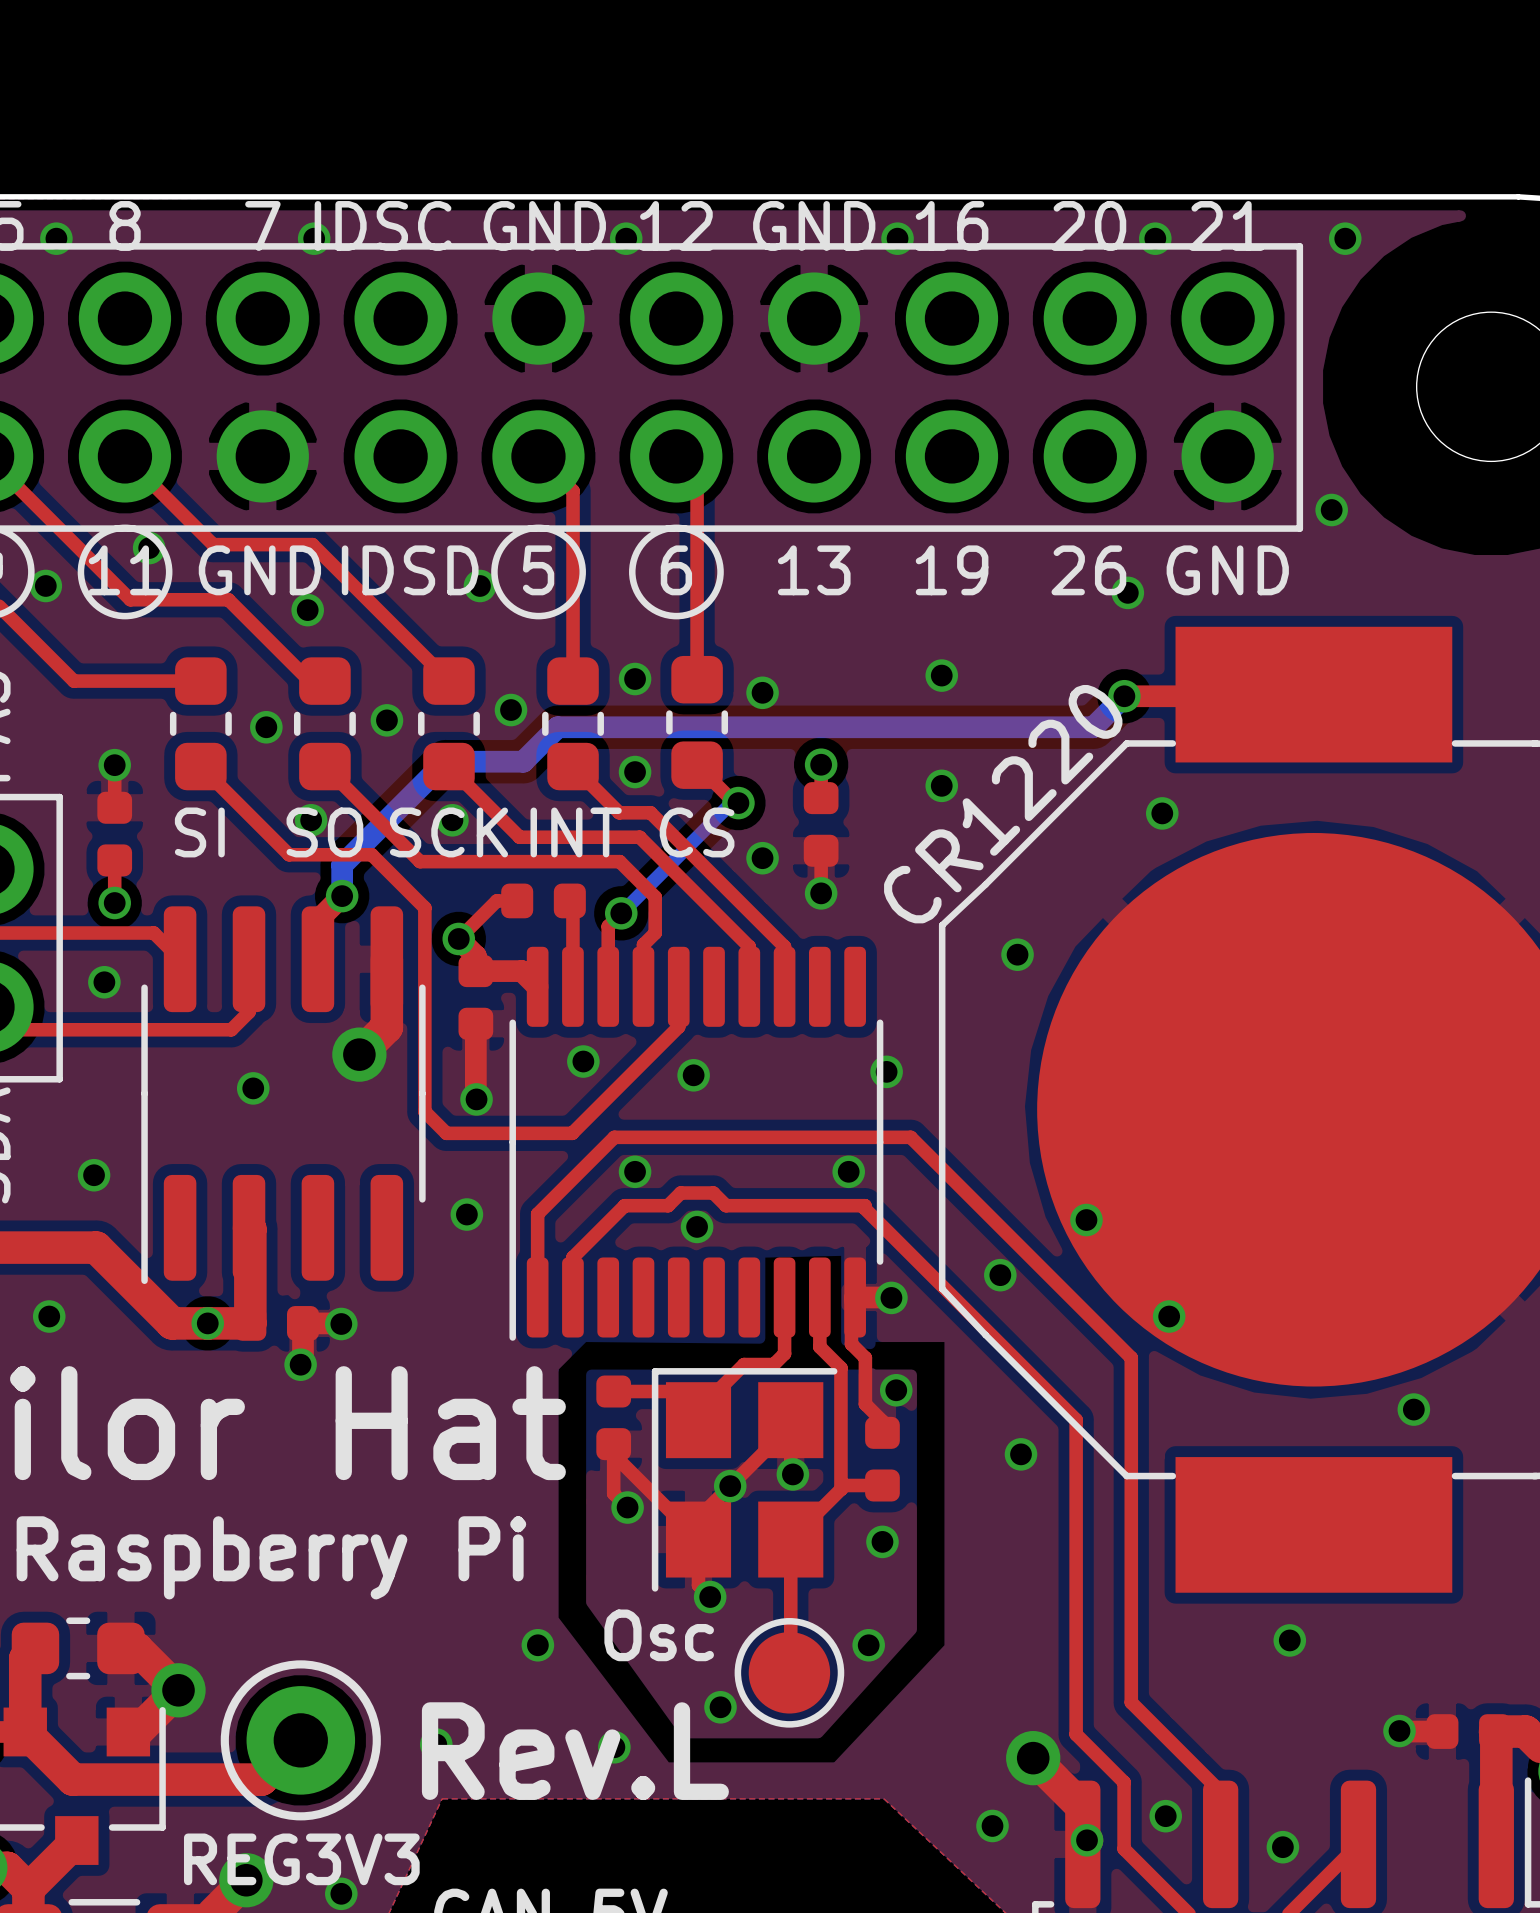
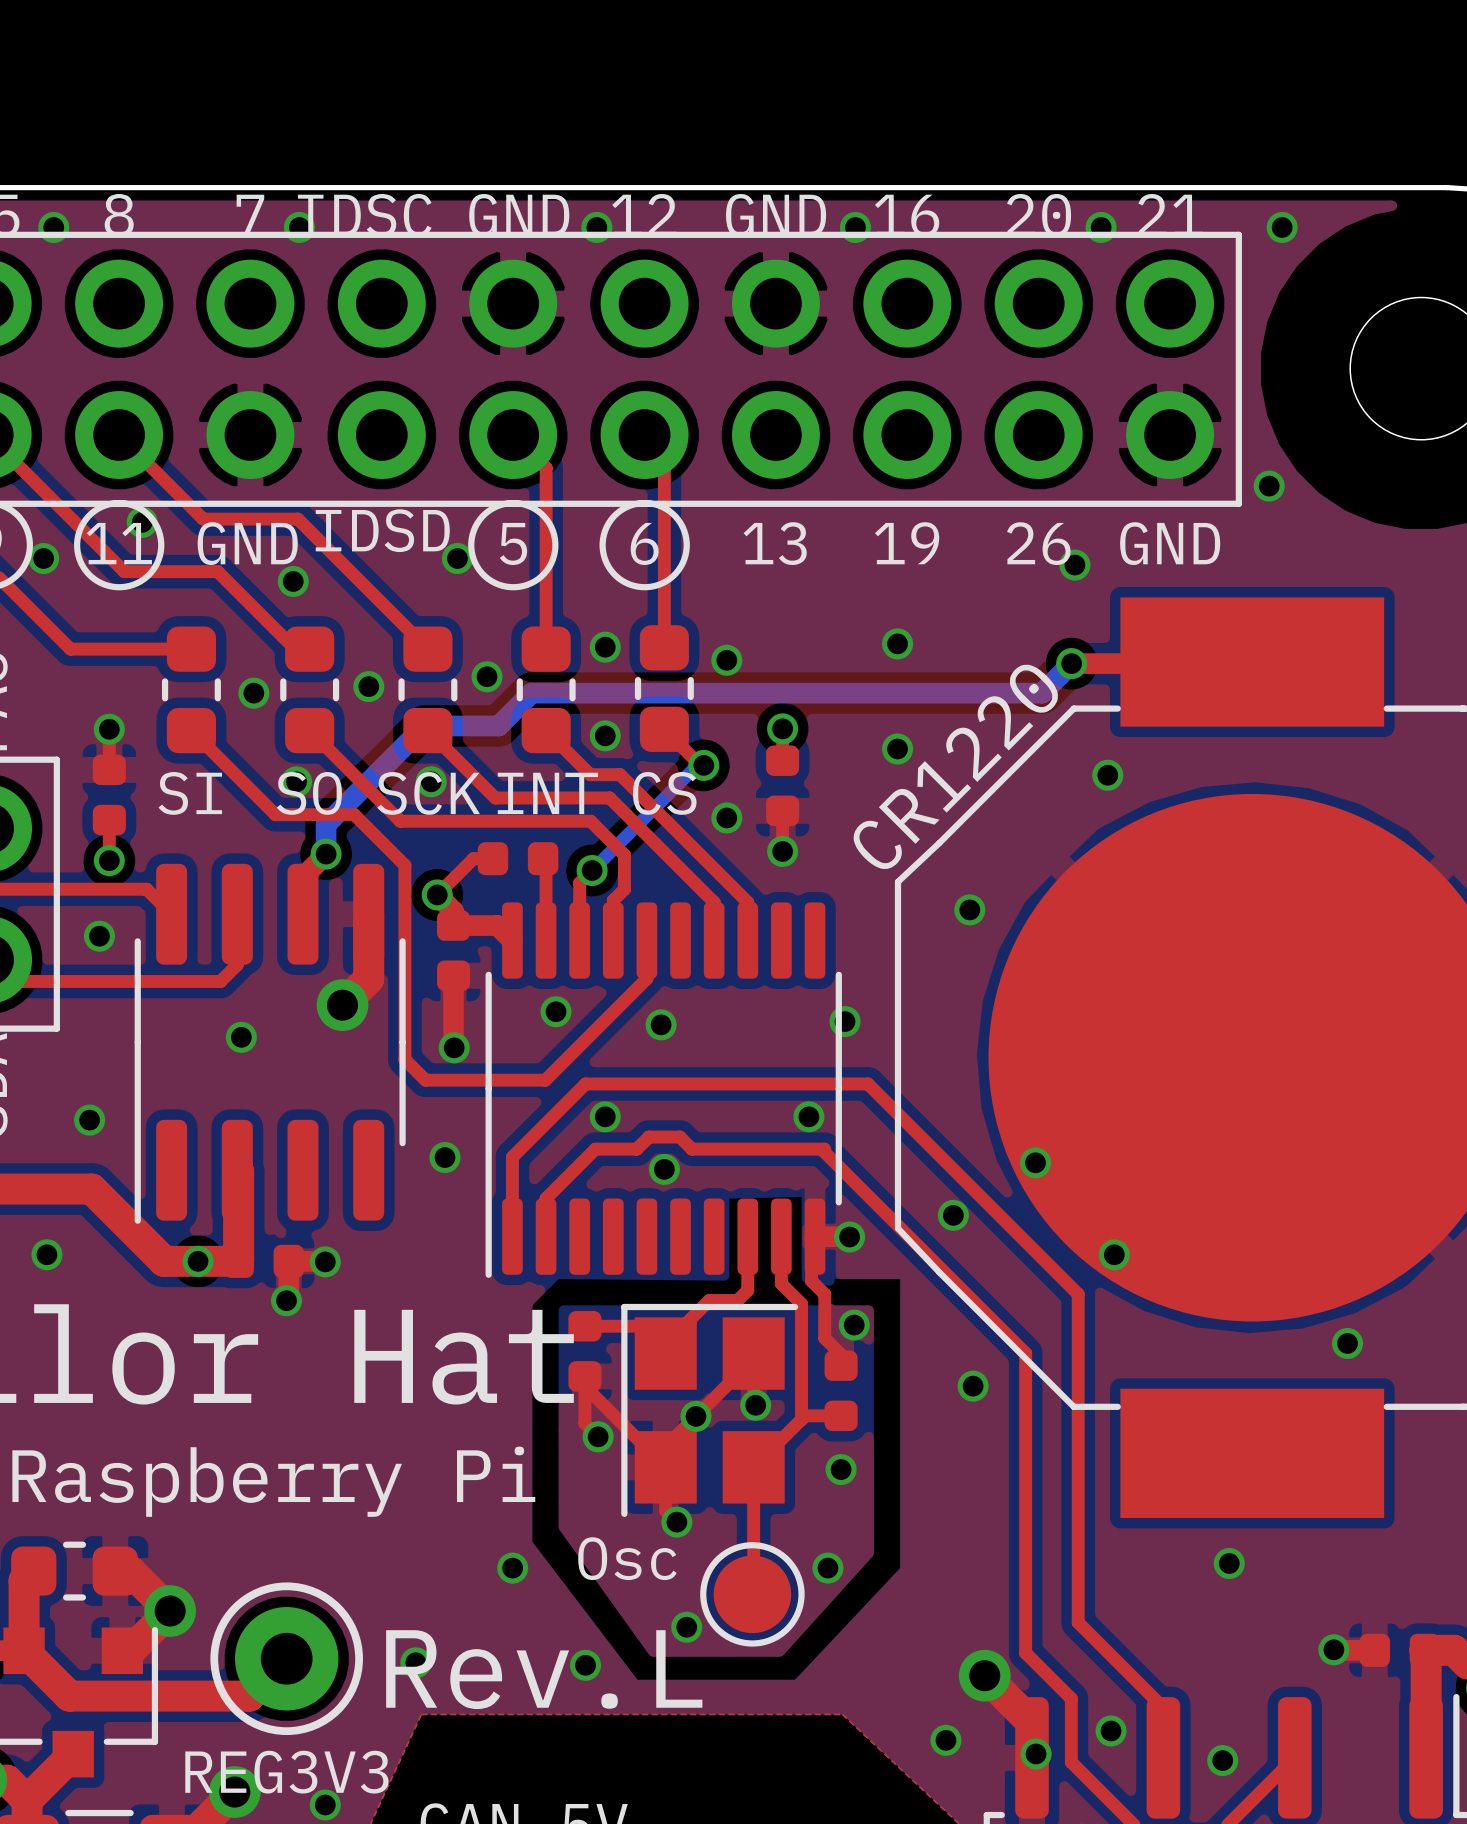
text position: IDSD (410, 570) -> IDSD (382, 530)

